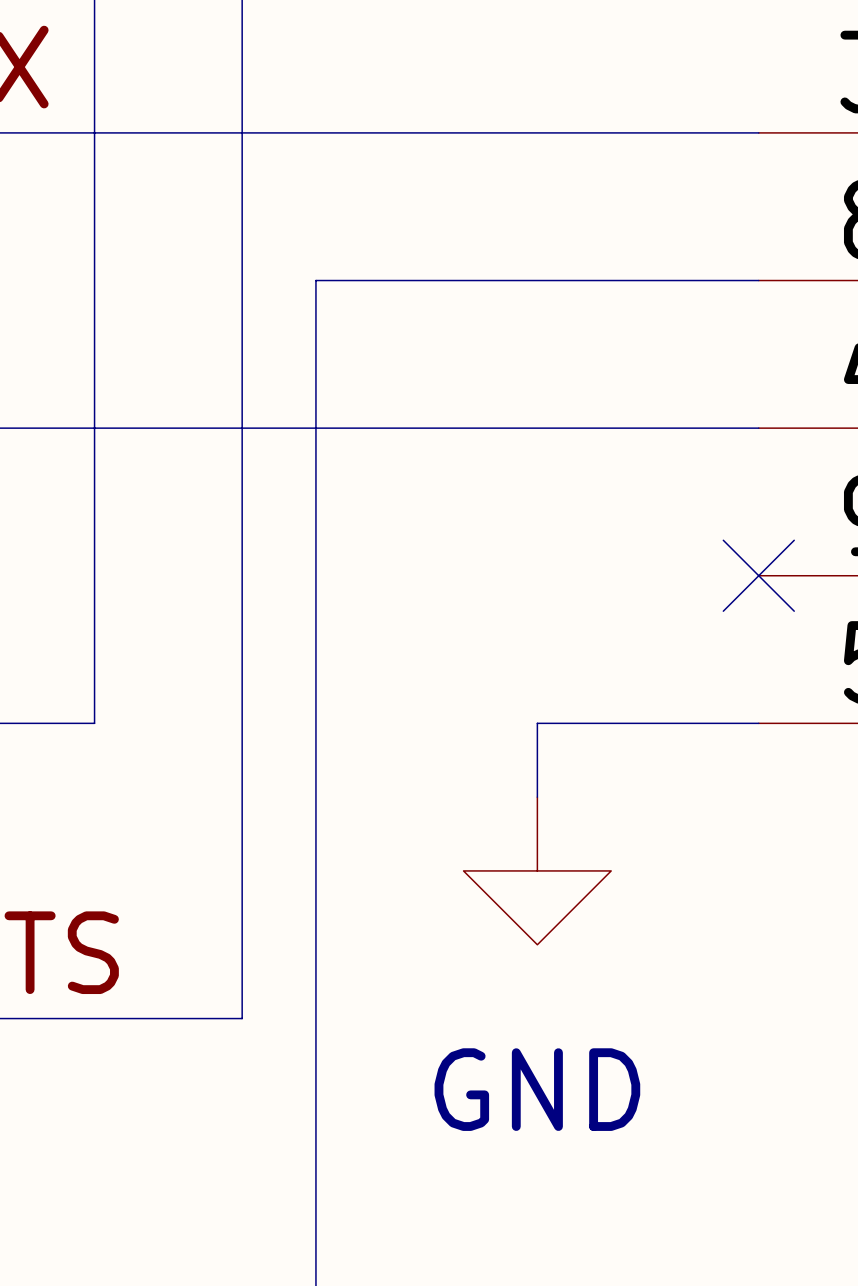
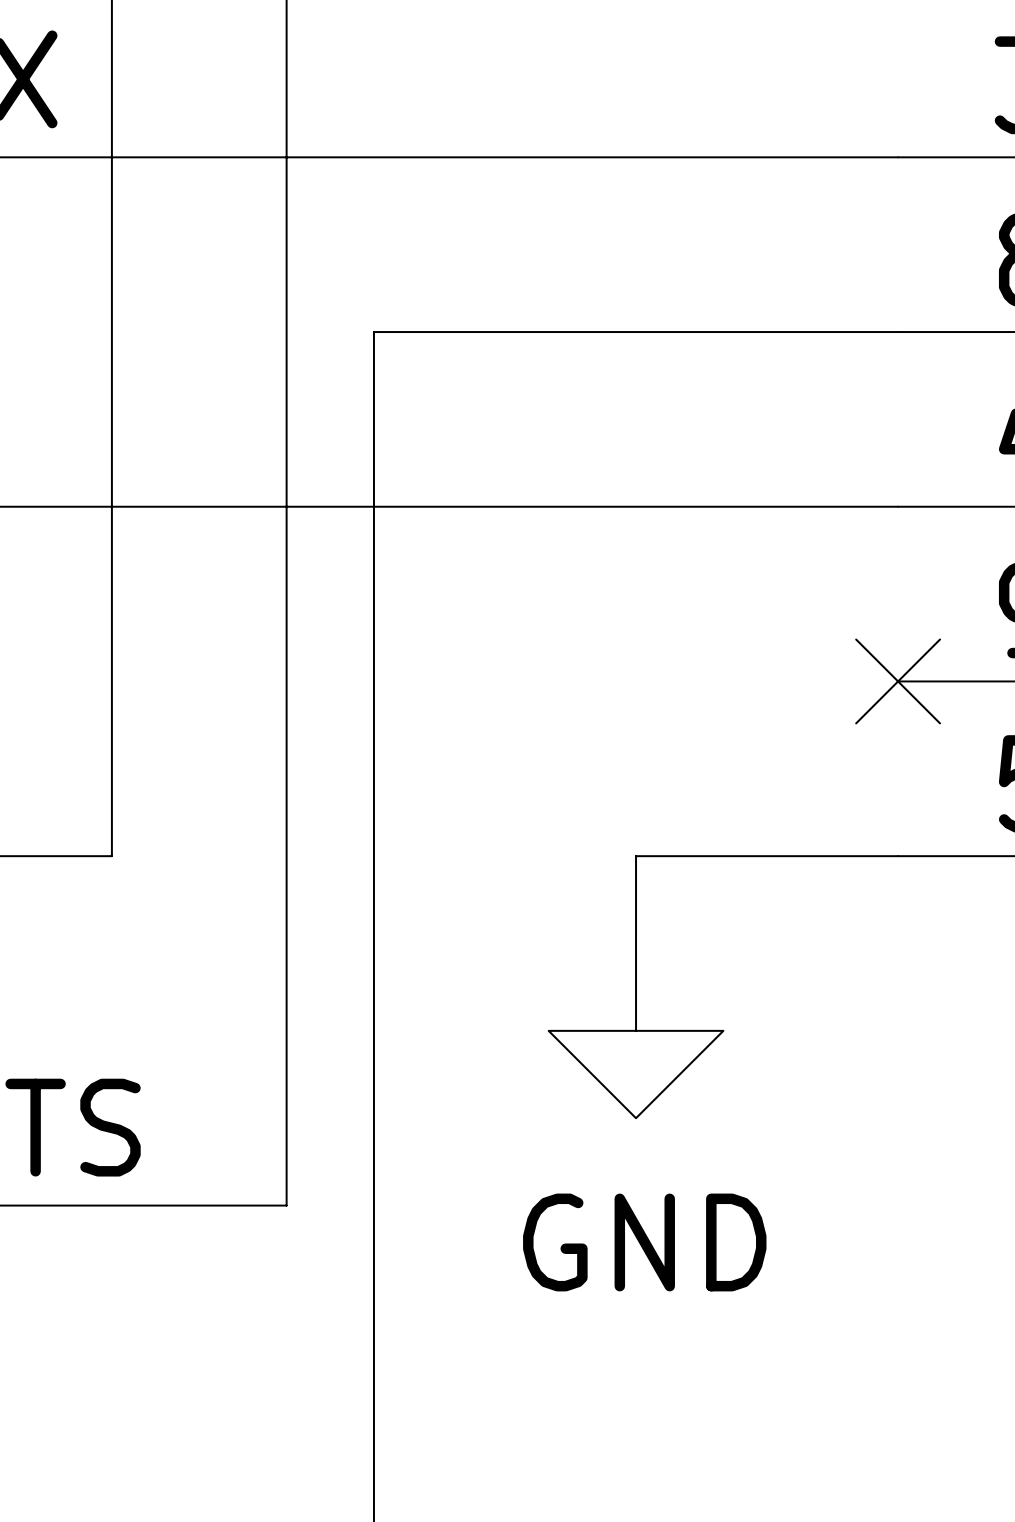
power symbol text position: GND (537, 1089) -> GND (644, 1242)

